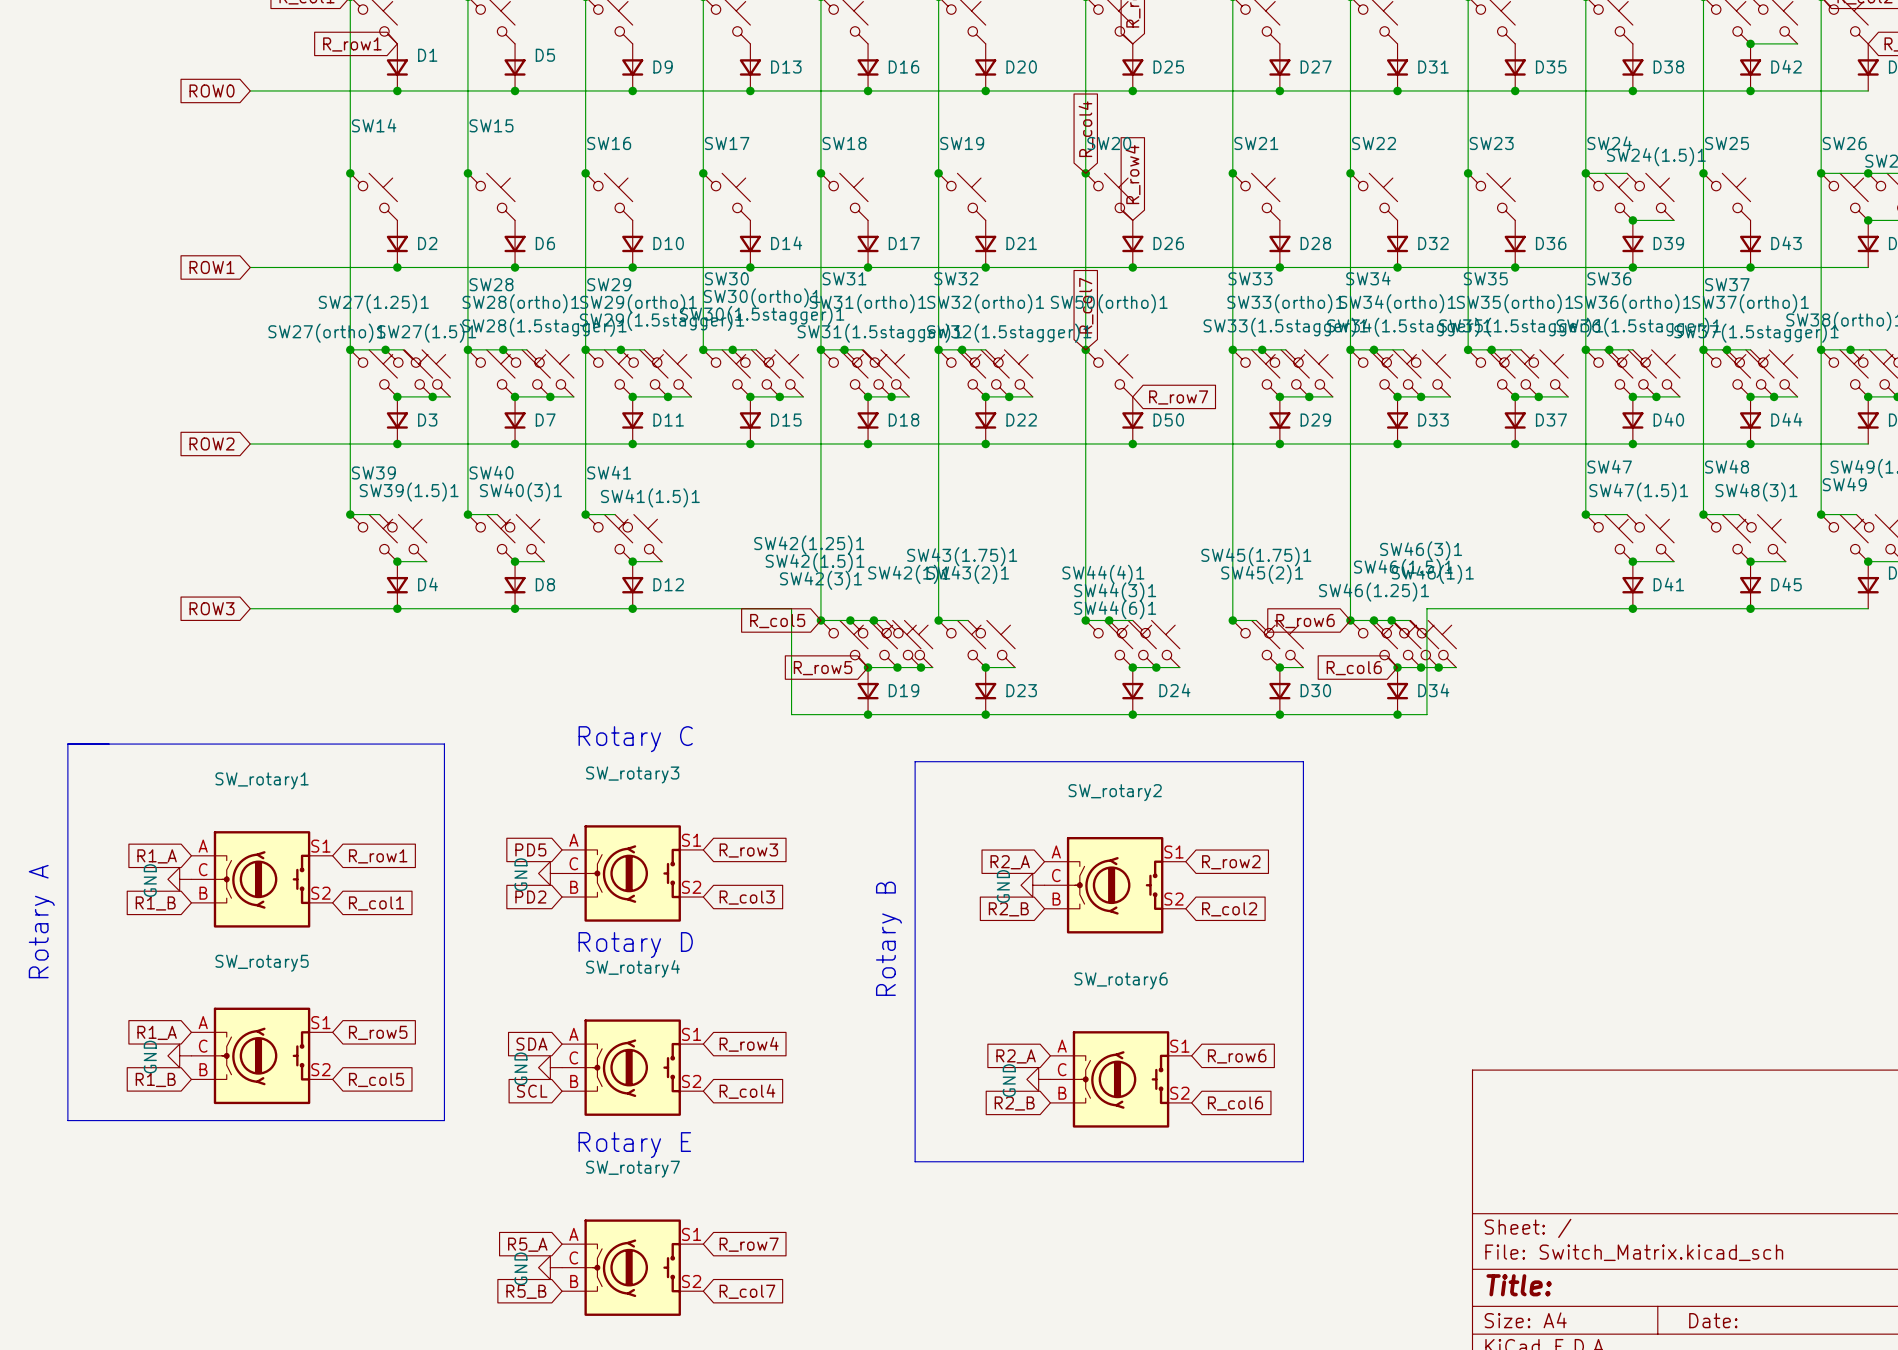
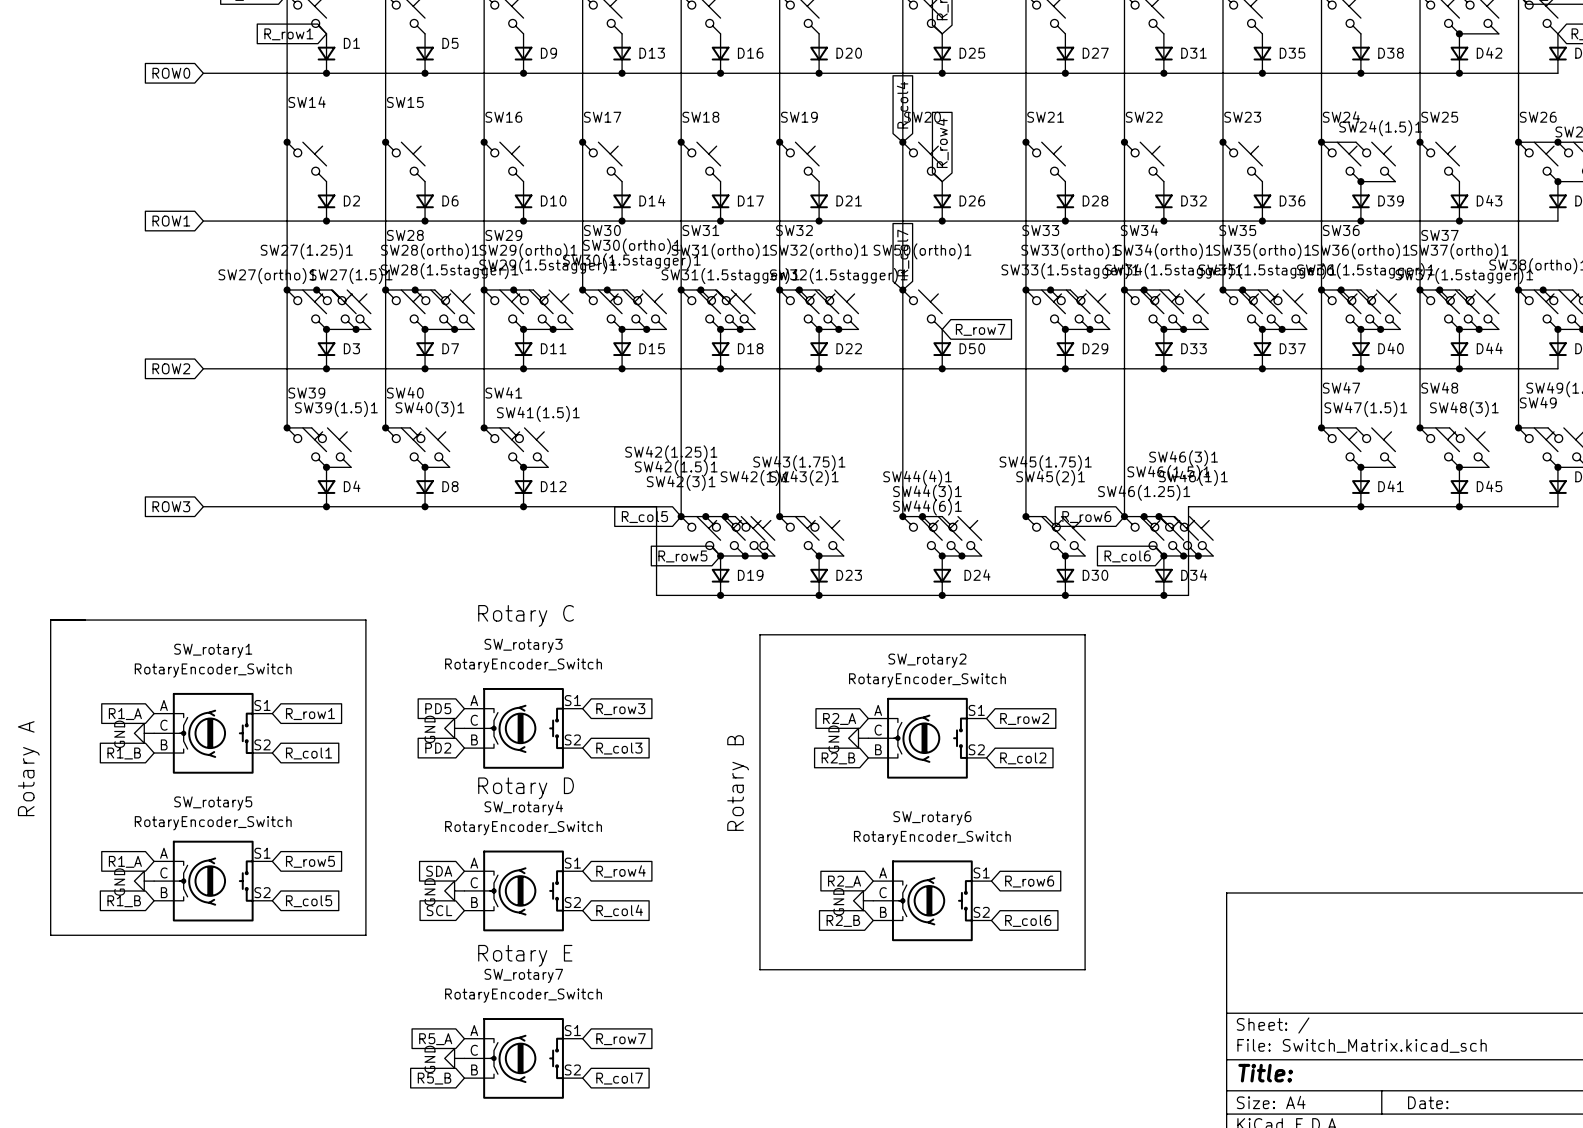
SW_rotary3 value: none -> RotaryEncoder_Switch (523, 665)
SW_rotary1 value: none -> RotaryEncoder_Switch (213, 670)
SW_rotary2 value: none -> RotaryEncoder_Switch (927, 680)
SW_rotary5 value: none -> RotaryEncoder_Switch (213, 823)
SW_rotary4 value: none -> RotaryEncoder_Switch (523, 828)
SW_rotary6 value: none -> RotaryEncoder_Switch (932, 838)
SW_rotary7 value: none -> RotaryEncoder_Switch (523, 995)

